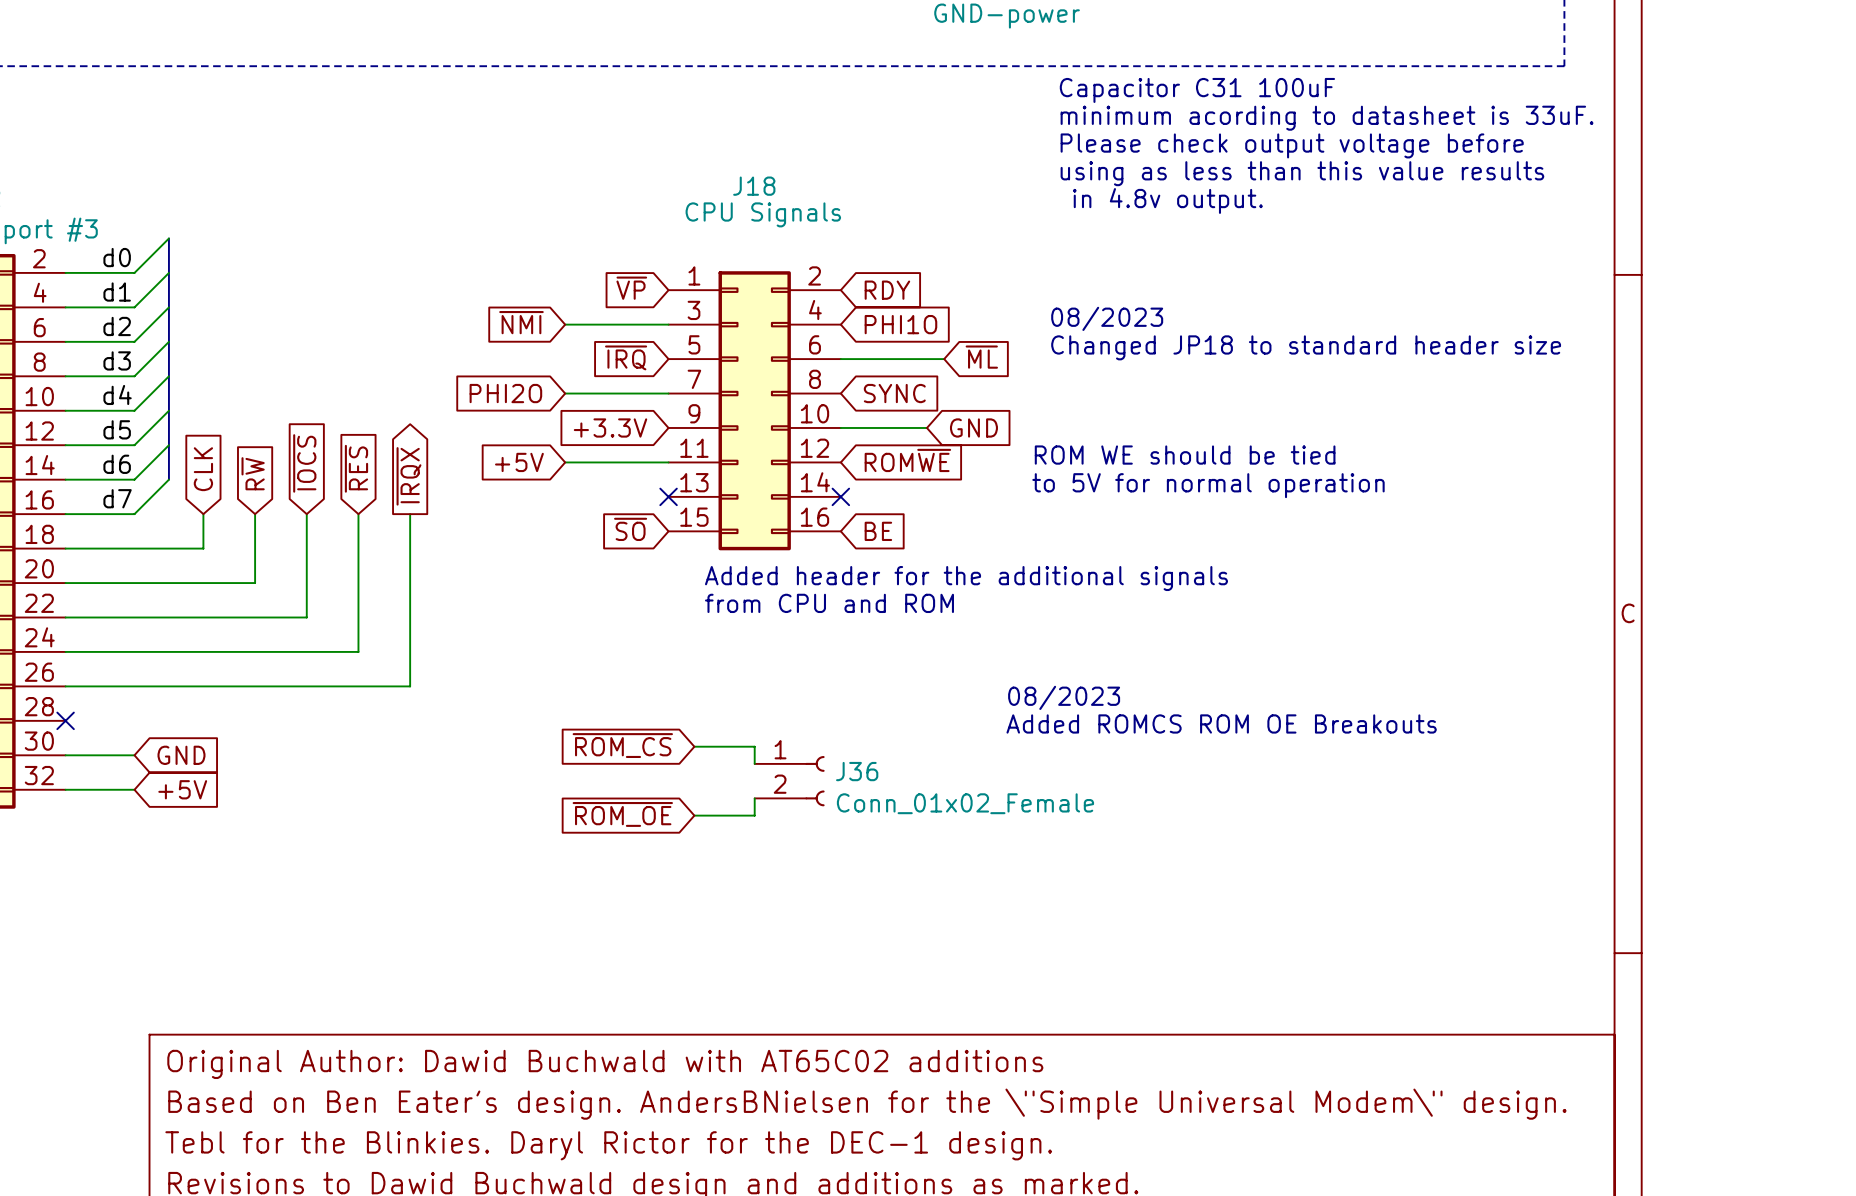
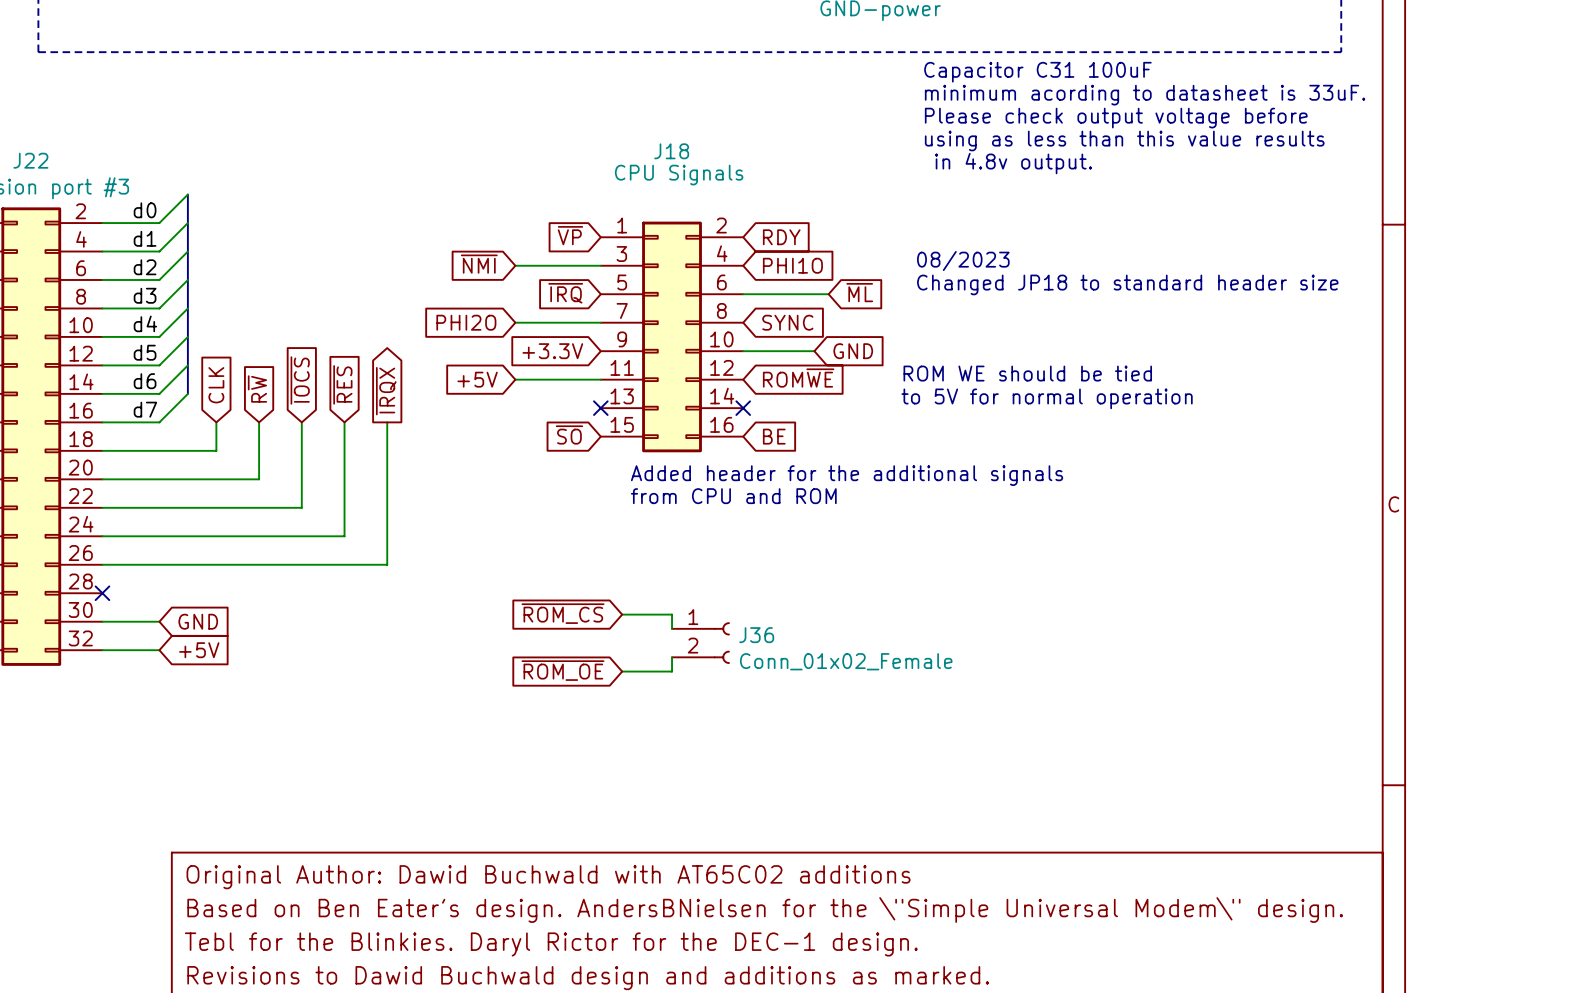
text: 08/2023 (1064, 697) -> none
text: Added ROMCS ROM OE Breakouts (1221, 723) -> none

